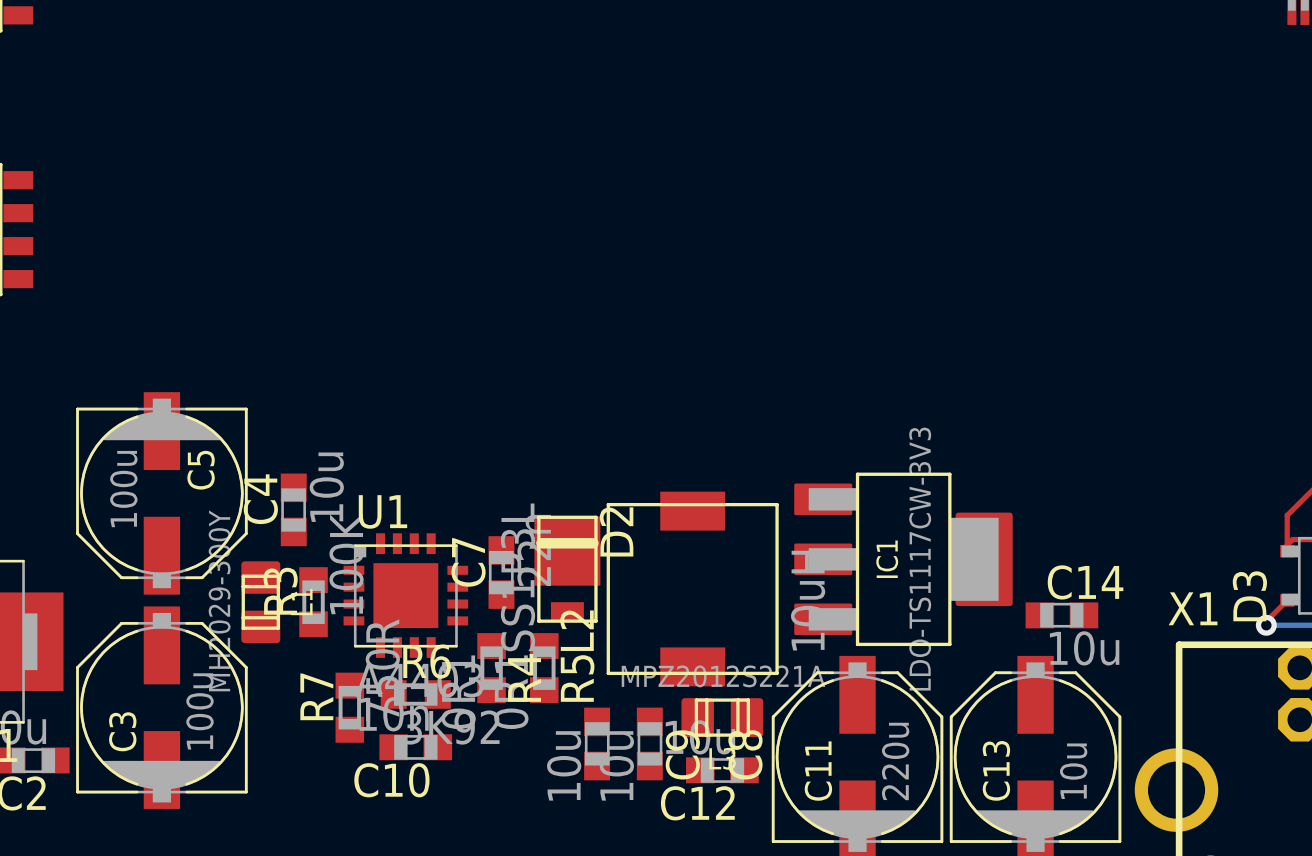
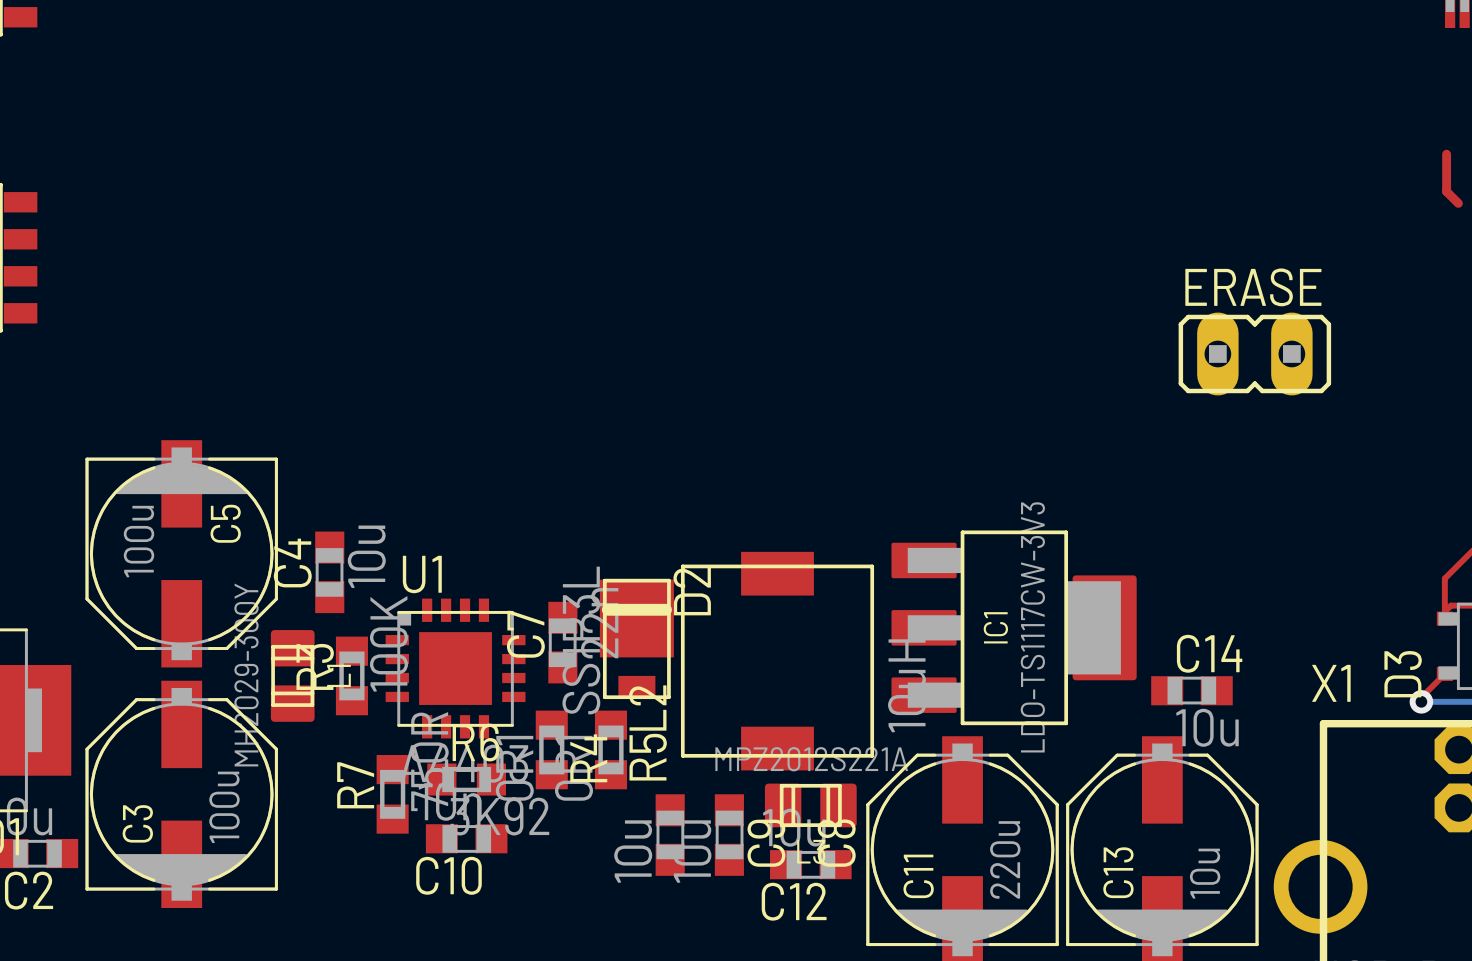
top track: none -> (1446, 154) (1446, 191) (1458, 203)
ERASE: none -> (1254, 353)

